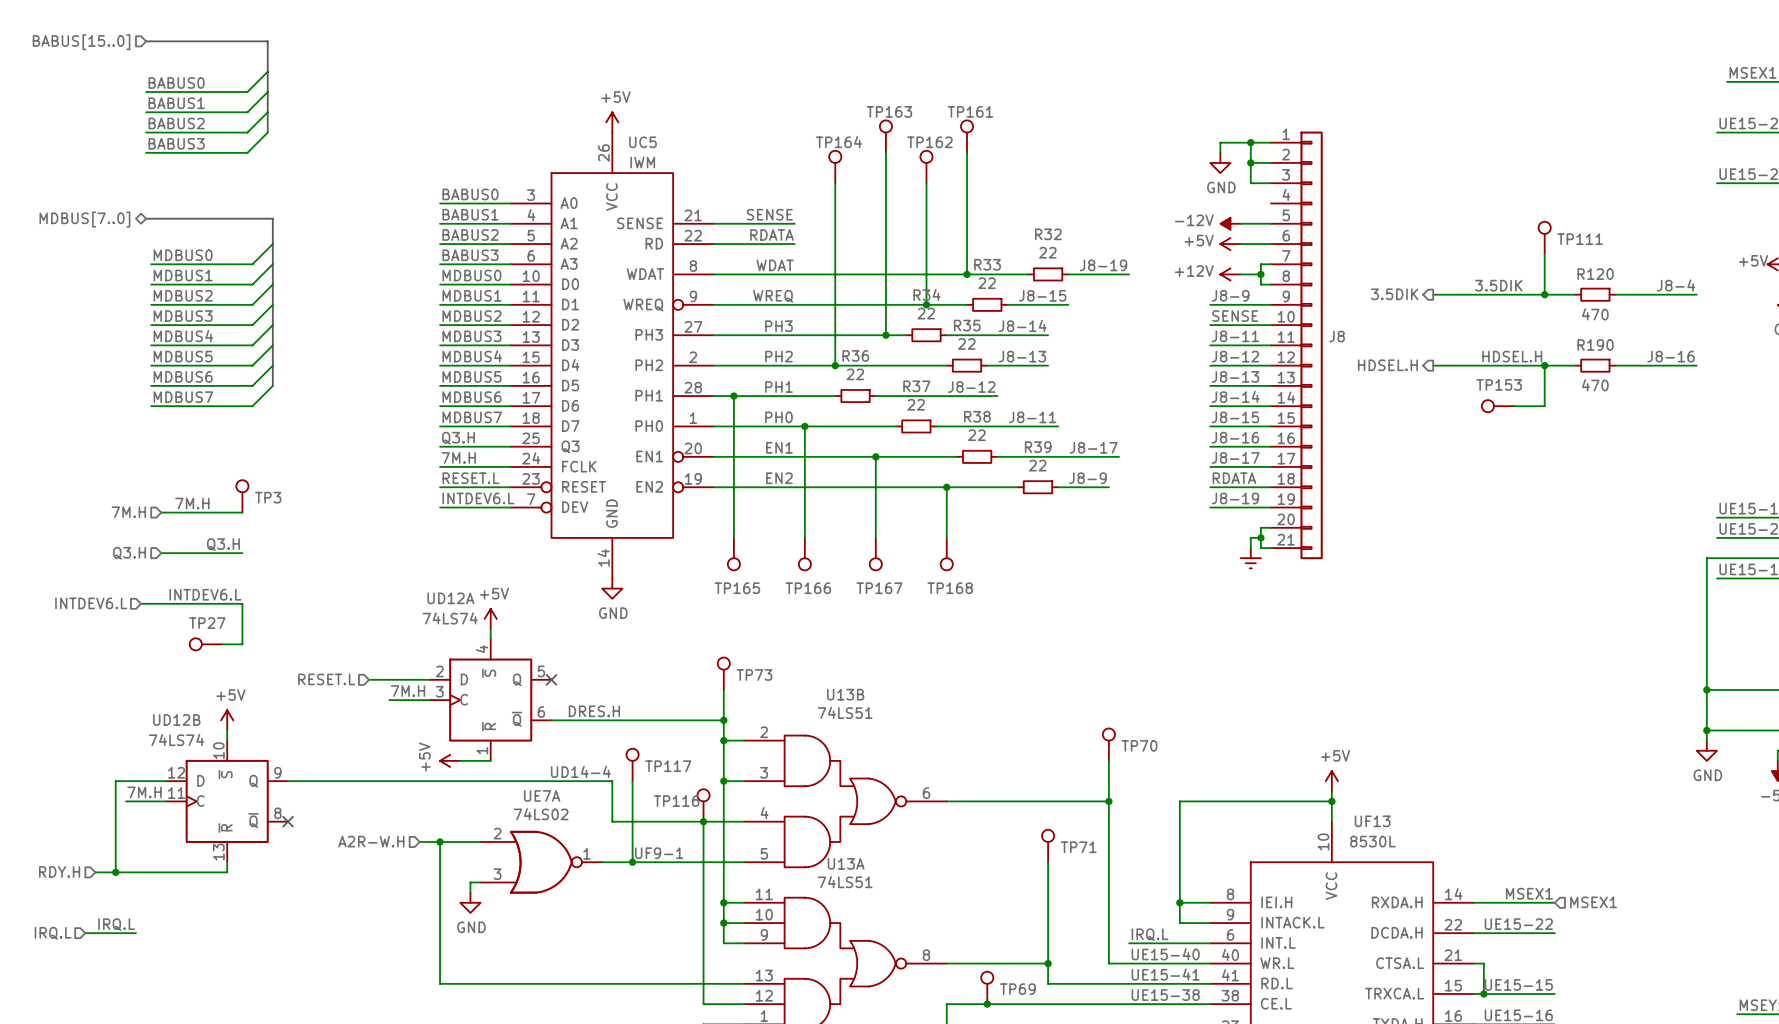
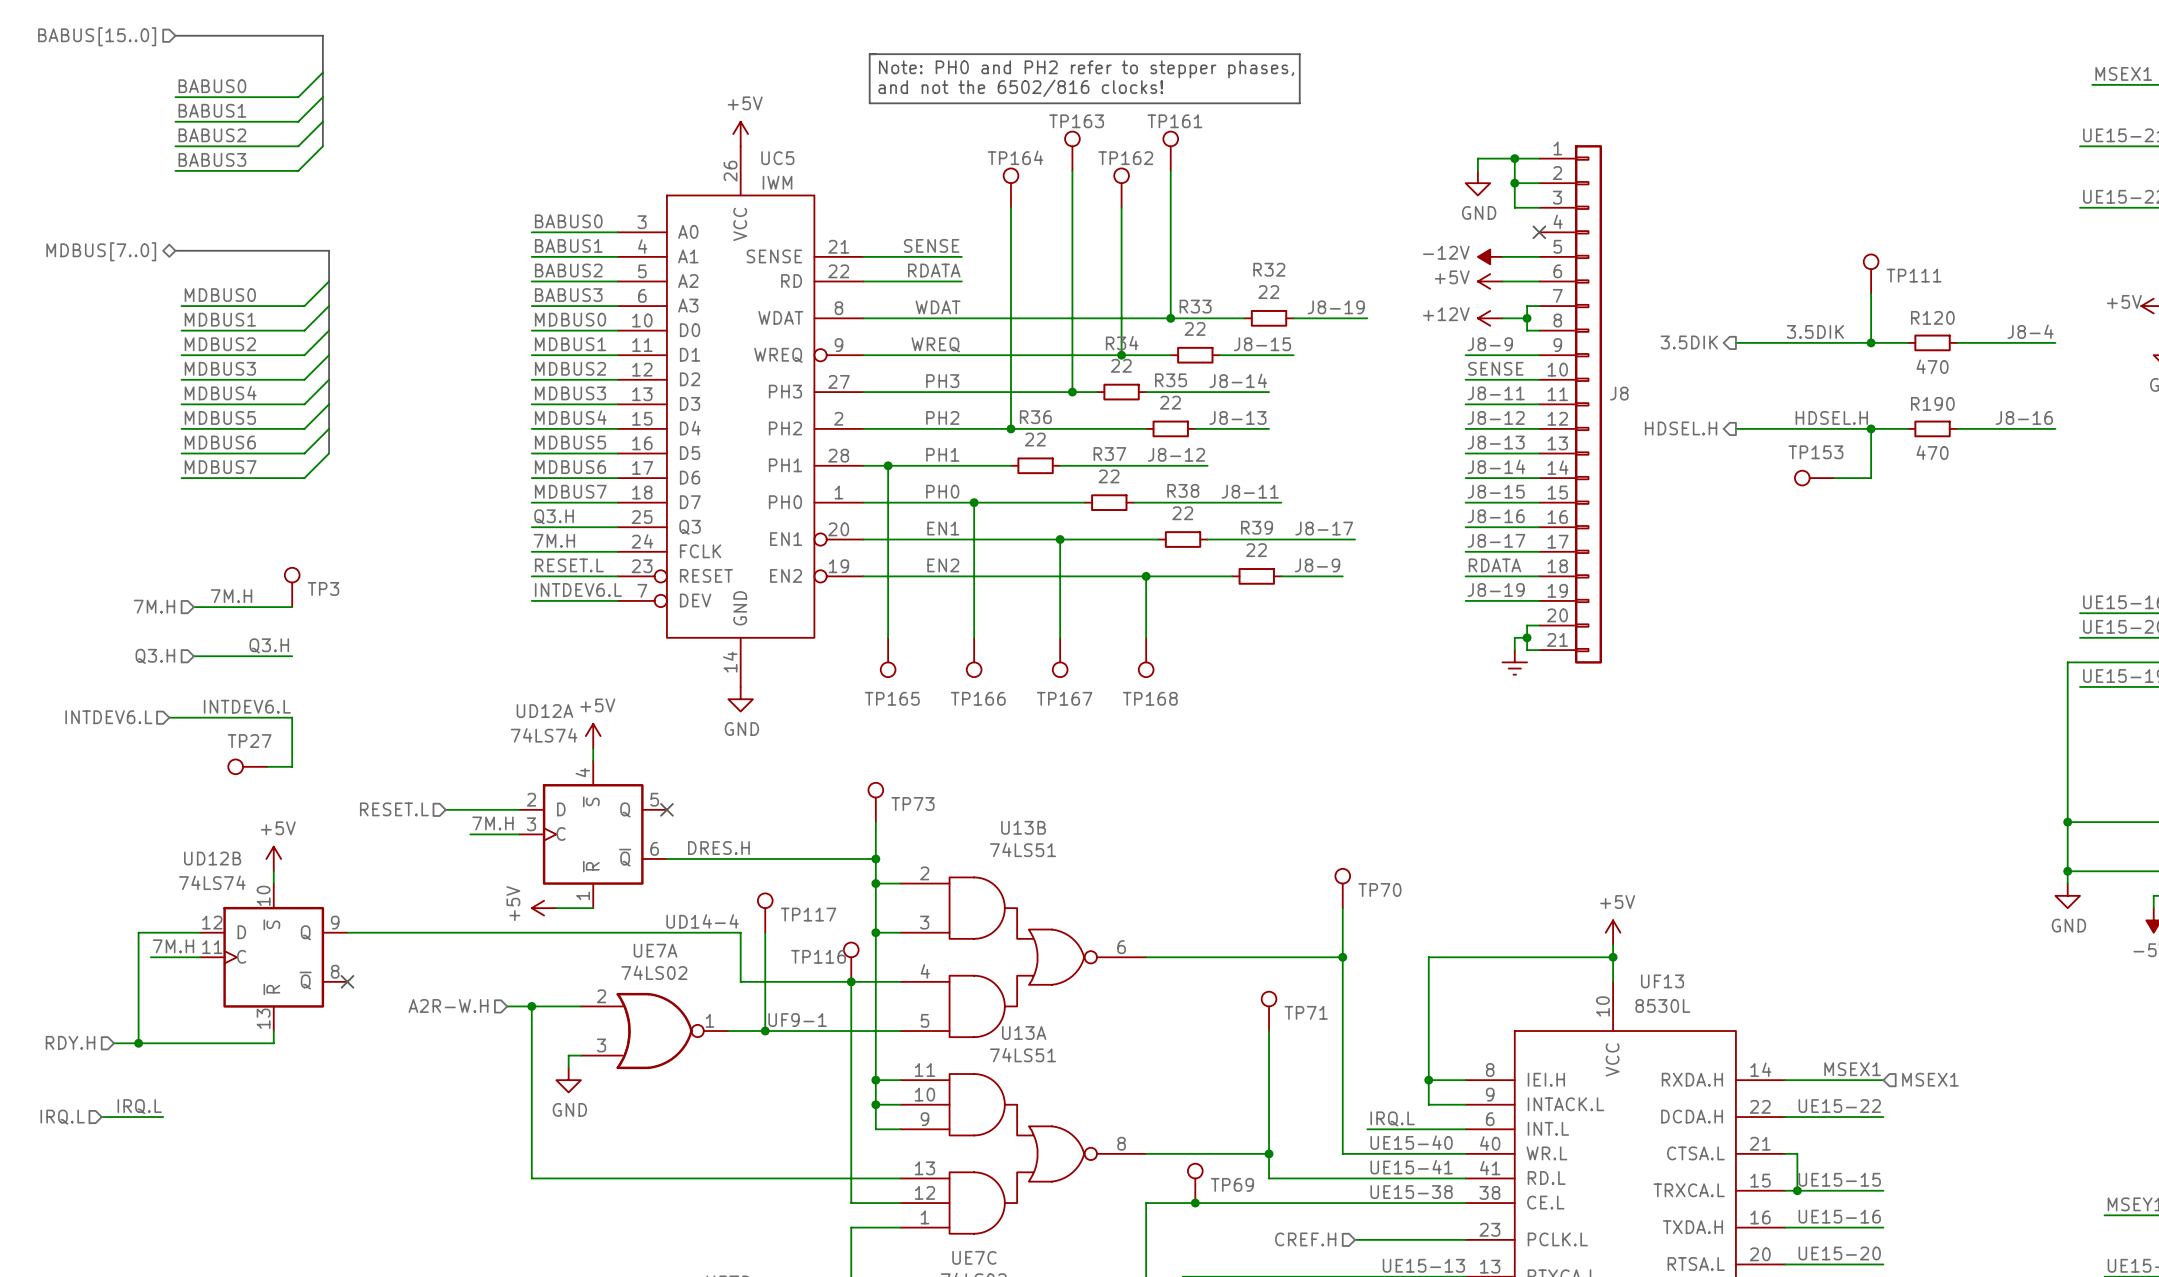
line: none -> (869, 54) (1299, 54) (1299, 103) (869, 103) (869, 54)
text: none -> Note: PH0 and PH2 refer to stepper phases, (1086, 69)
text: none -> and not the 6502/816 clocks! (1020, 88)
no-connect mark: none -> (1539, 232)

